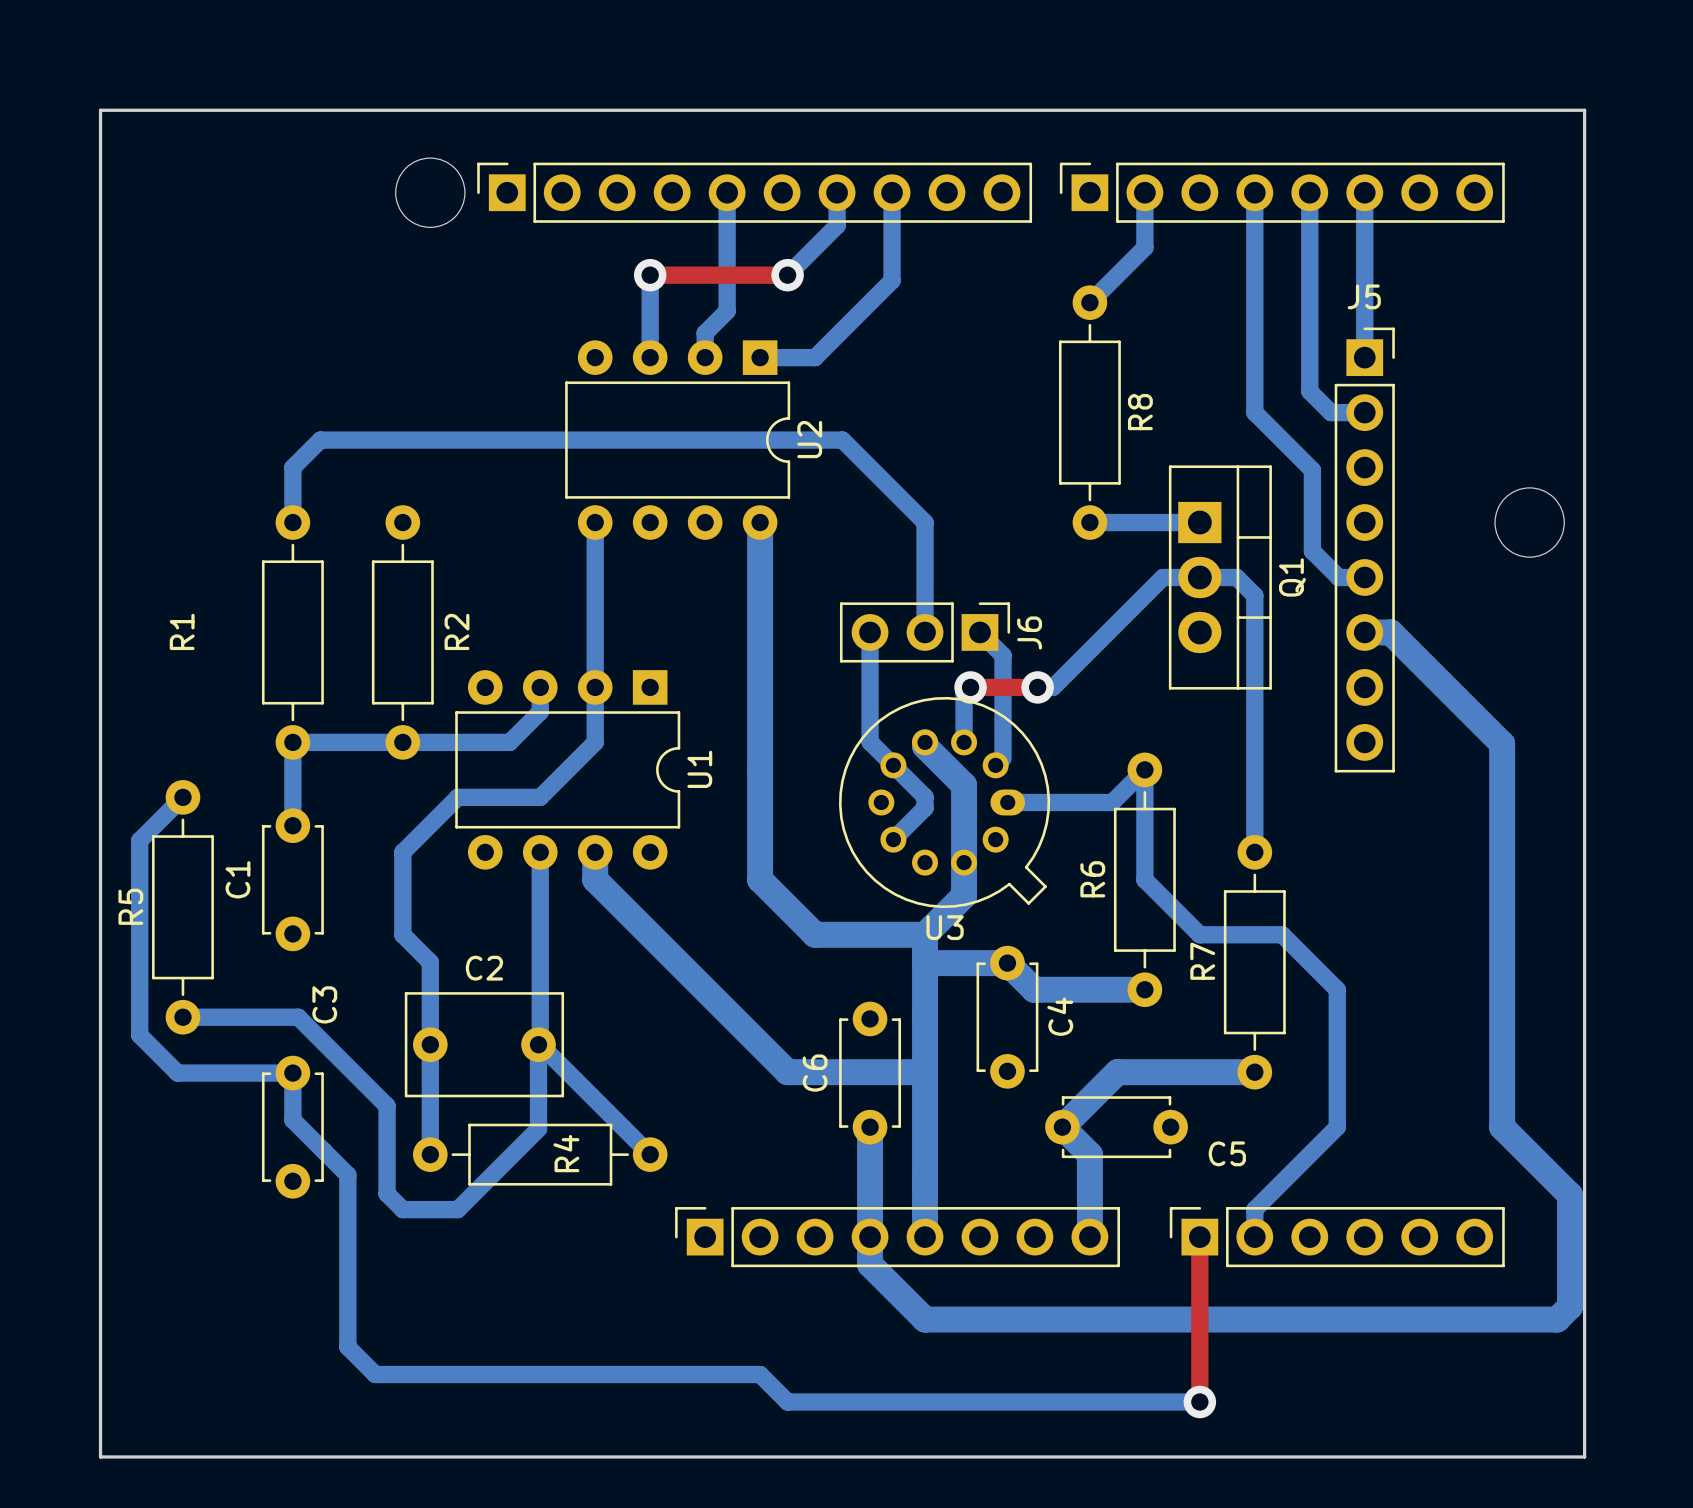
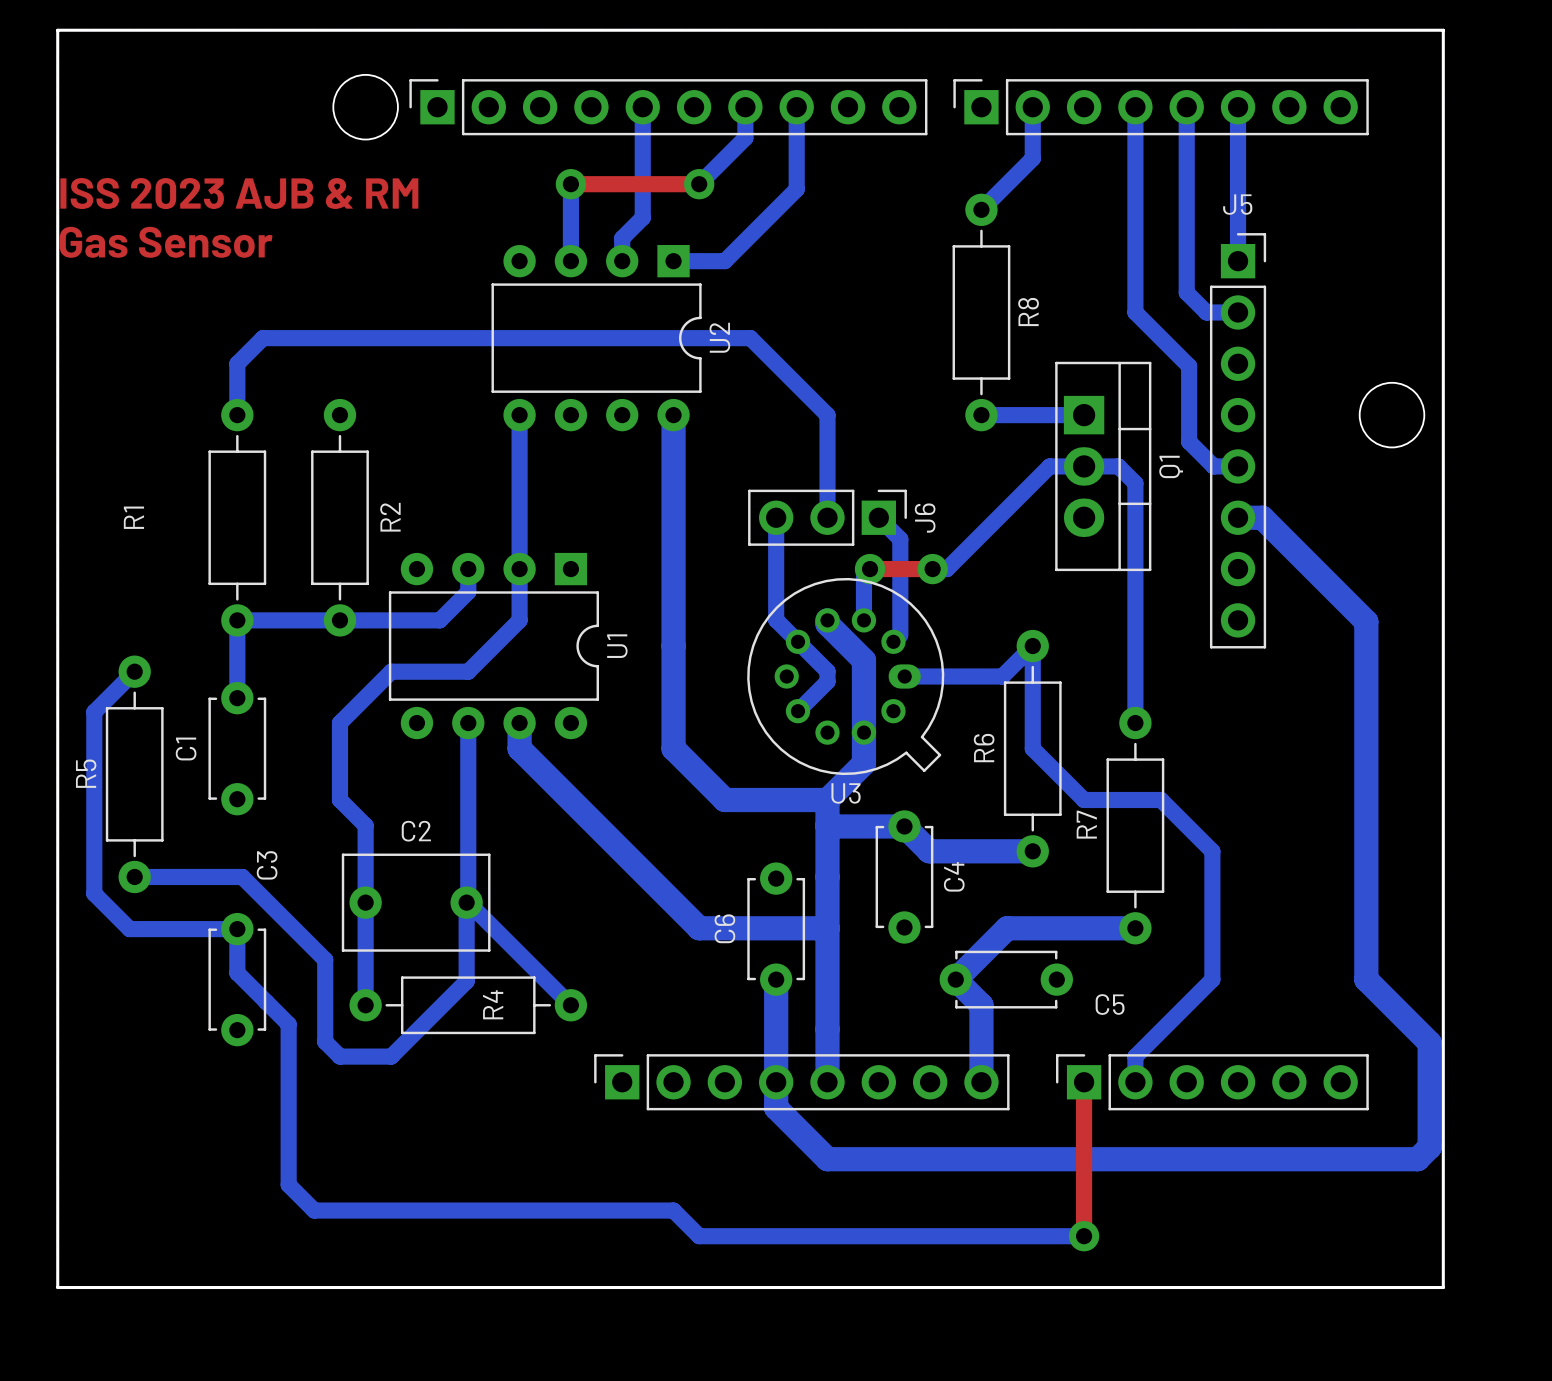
text: none -> ISS 2023 AJB & RM (239, 193)
text: none -> Gas Sensor (166, 242)

